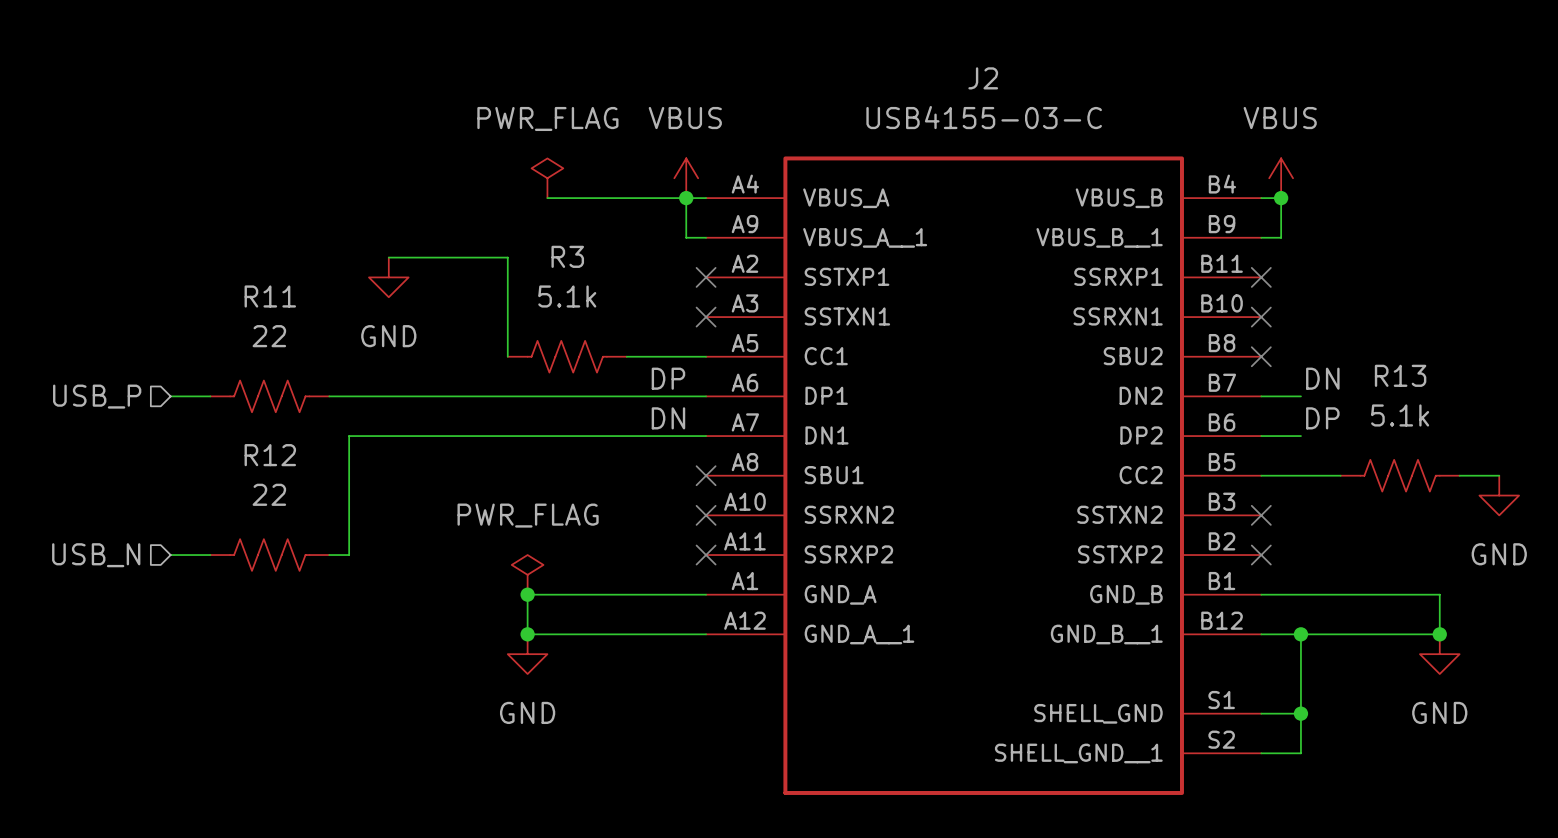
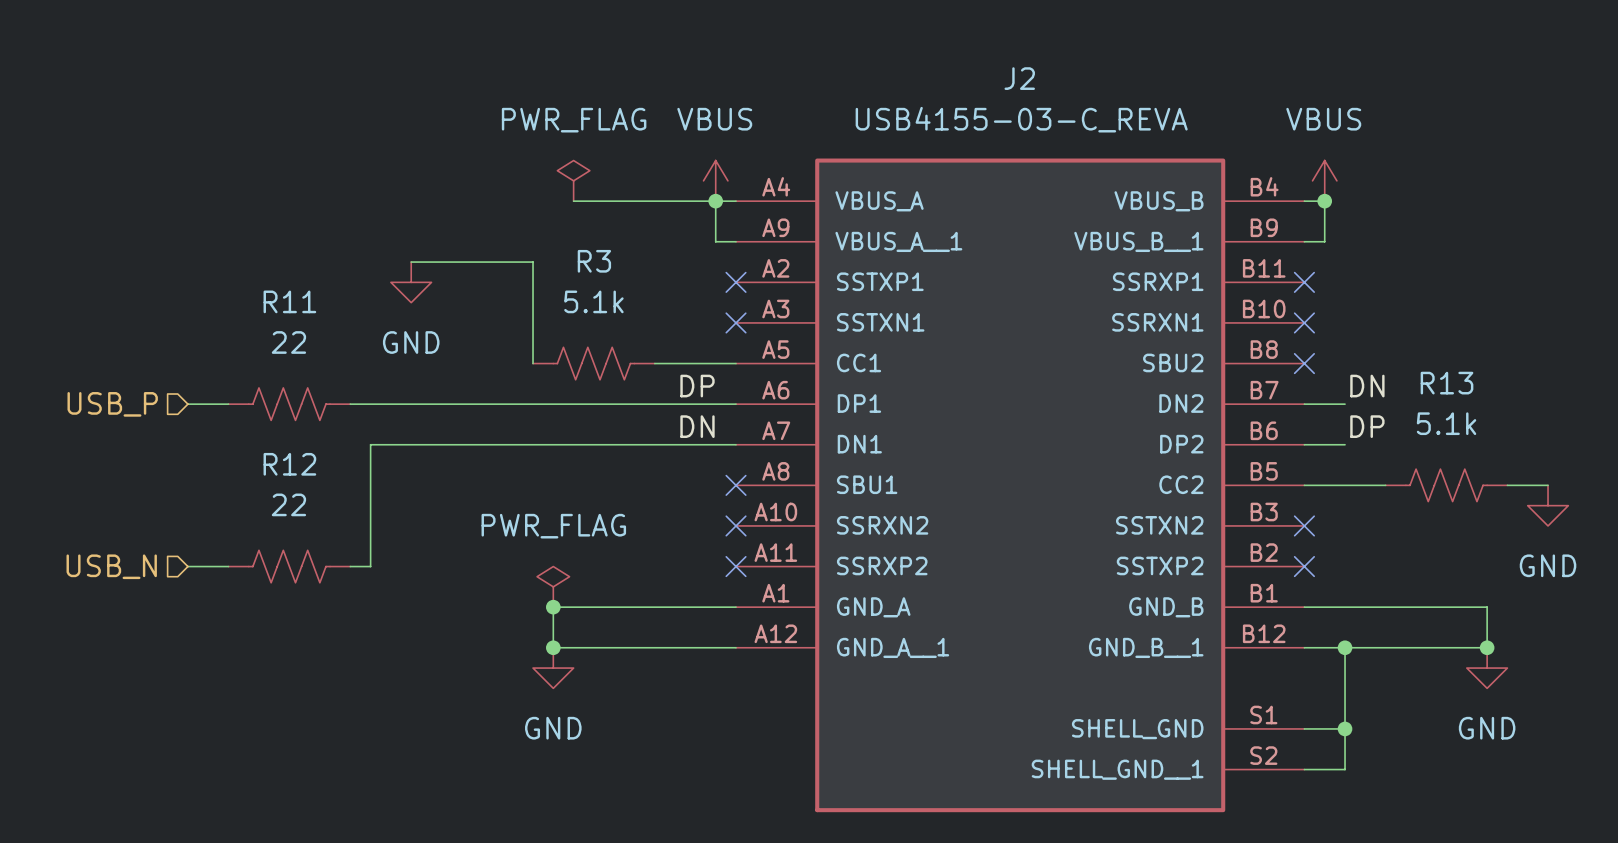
J2 value: USB4155-03-C (984, 117) -> USB4155-03-C_REVA (1021, 119)

